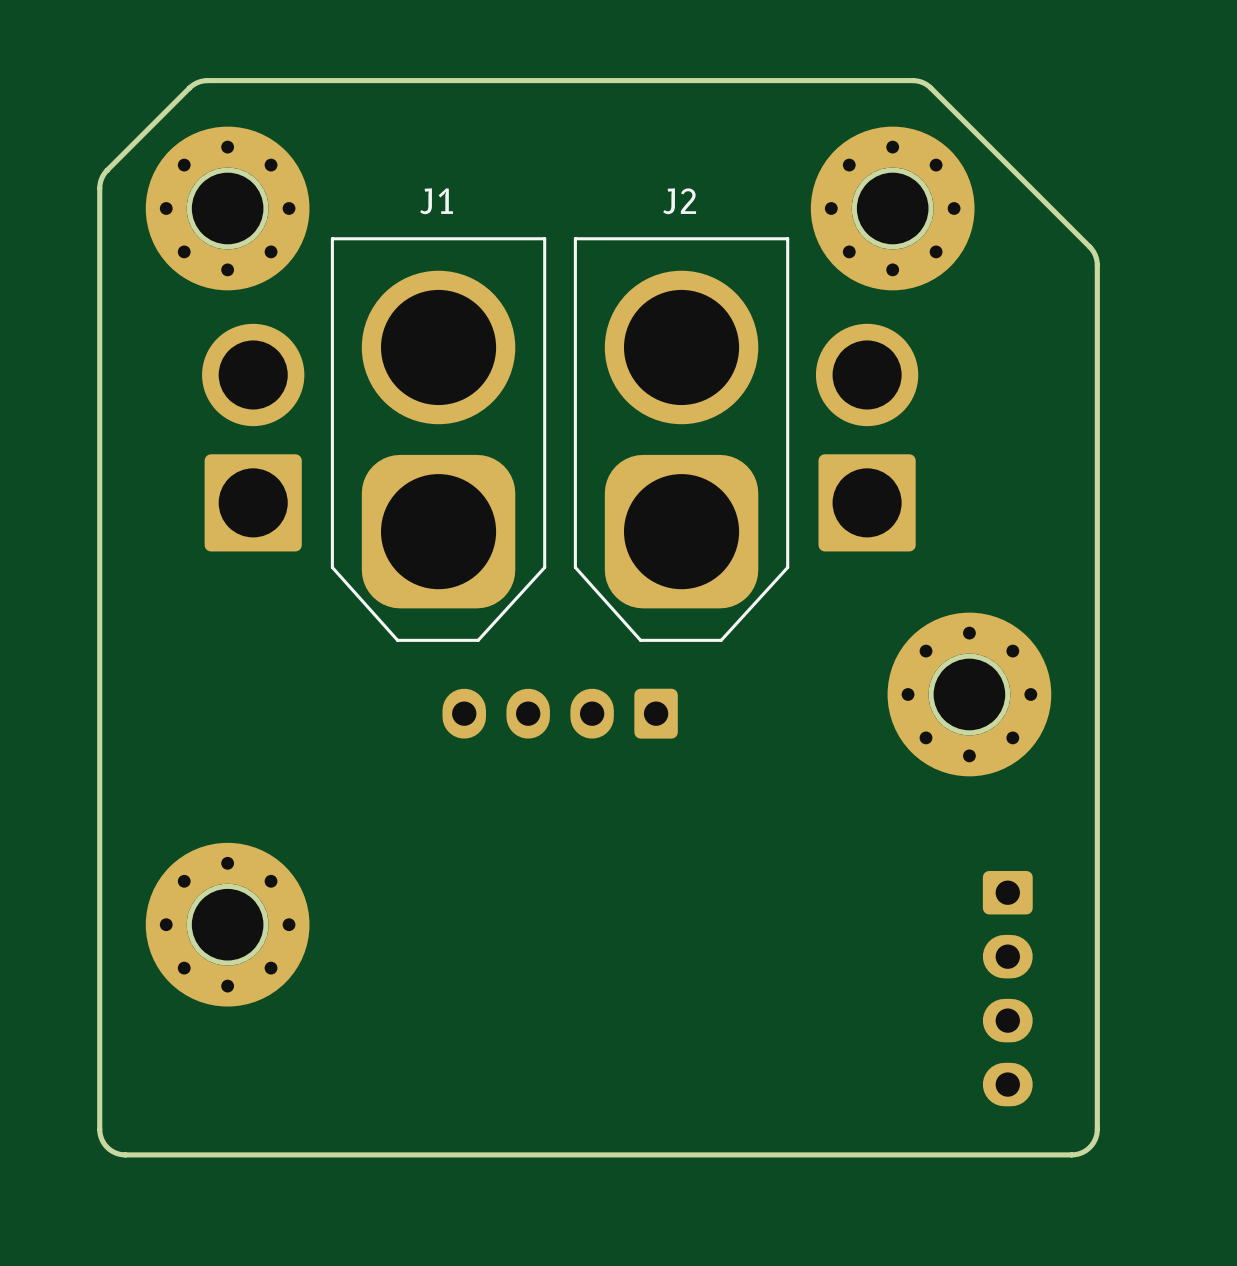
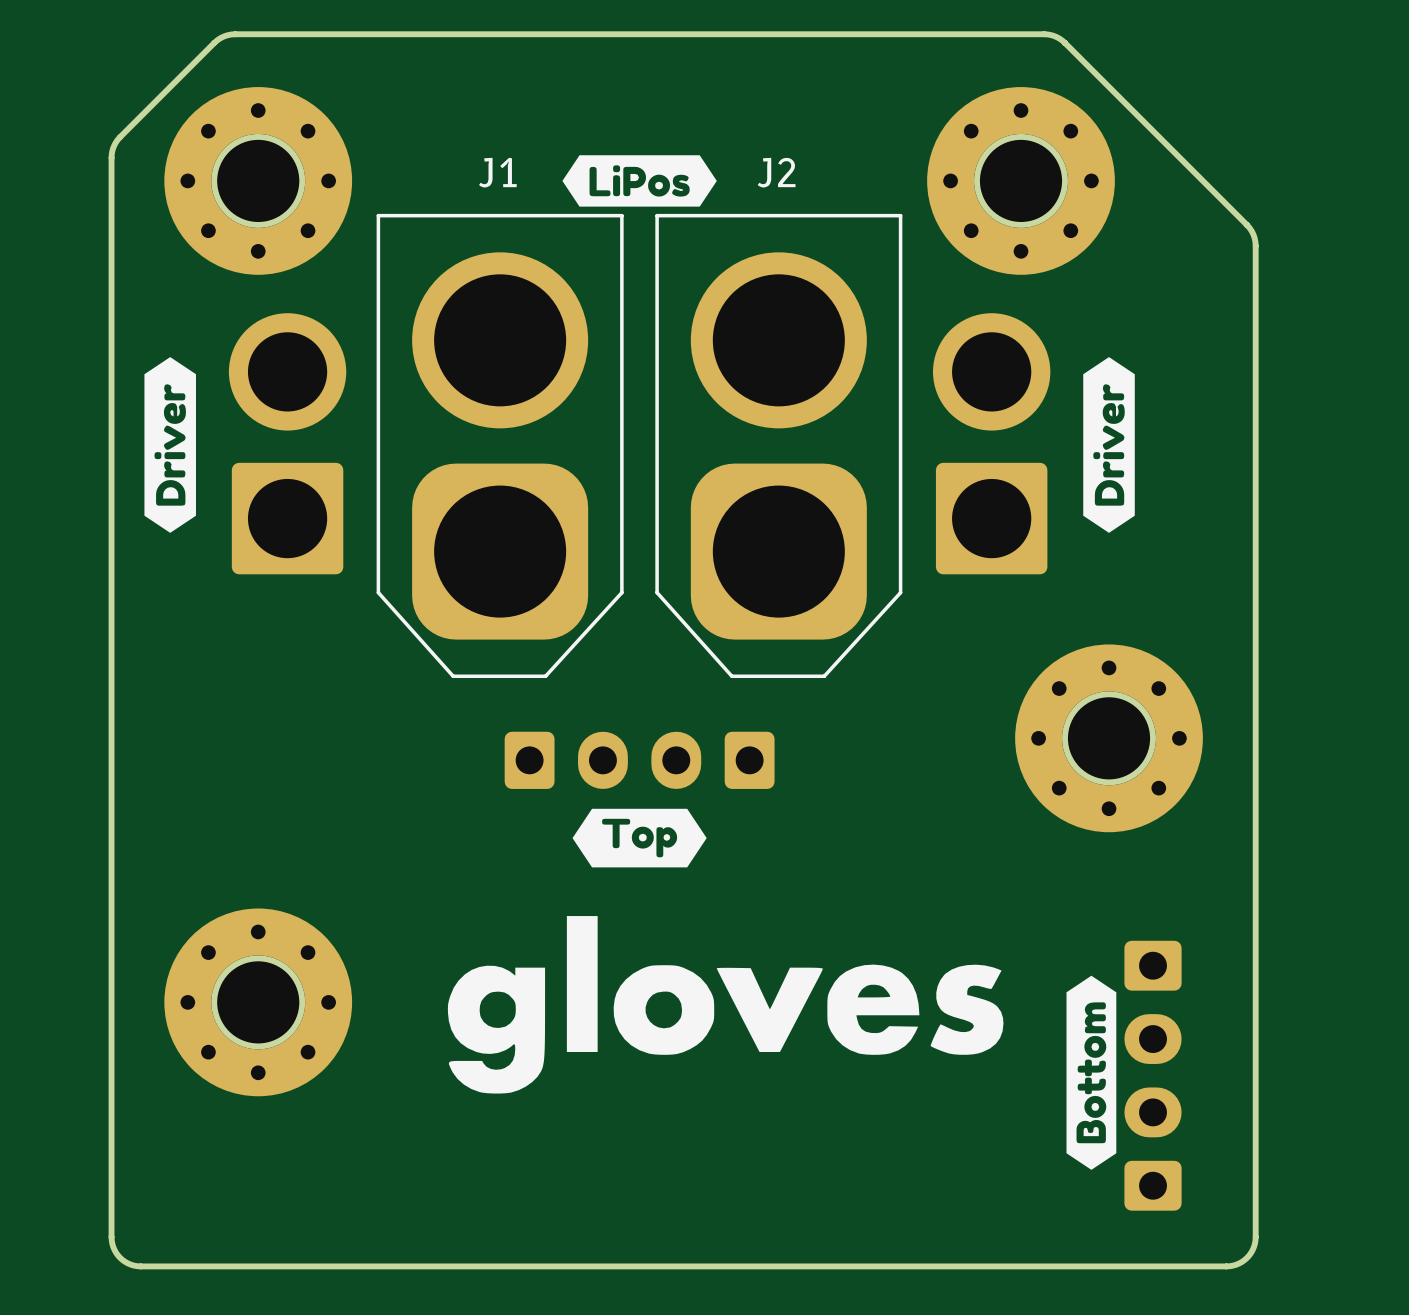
drawing: none -> [562, 155, 717, 207]
drawing: none -> [144, 357, 196, 533]
drawing: none -> [1083, 357, 1135, 533]
part footprint: [442, 688, 678, 739] -> [504, 731, 775, 789]
drawing: none -> [572, 808, 707, 868]
drawing: none -> [447, 916, 1004, 1094]
part footprint: [982, 870, 1033, 1107] -> [1124, 940, 1182, 1211]
drawing: none -> [1066, 975, 1117, 1170]

